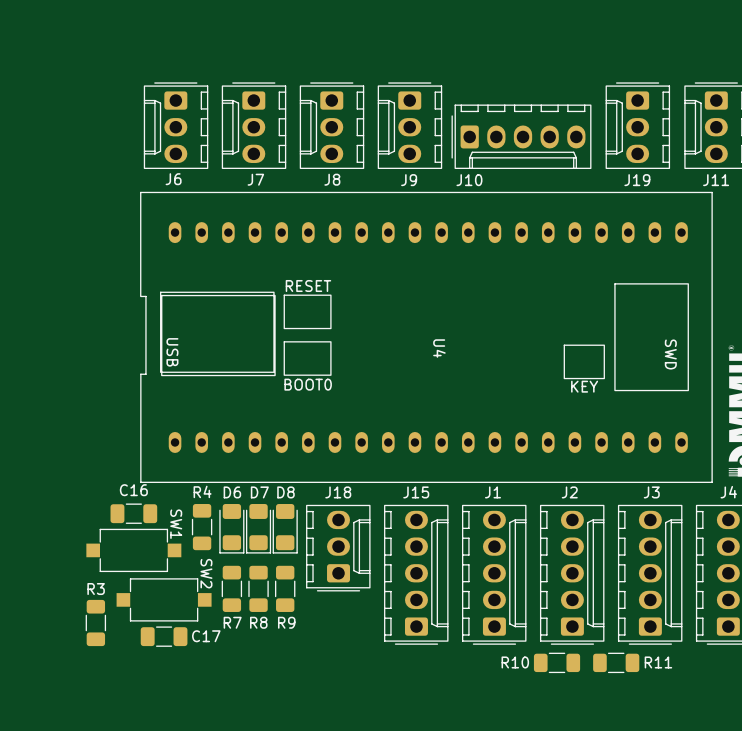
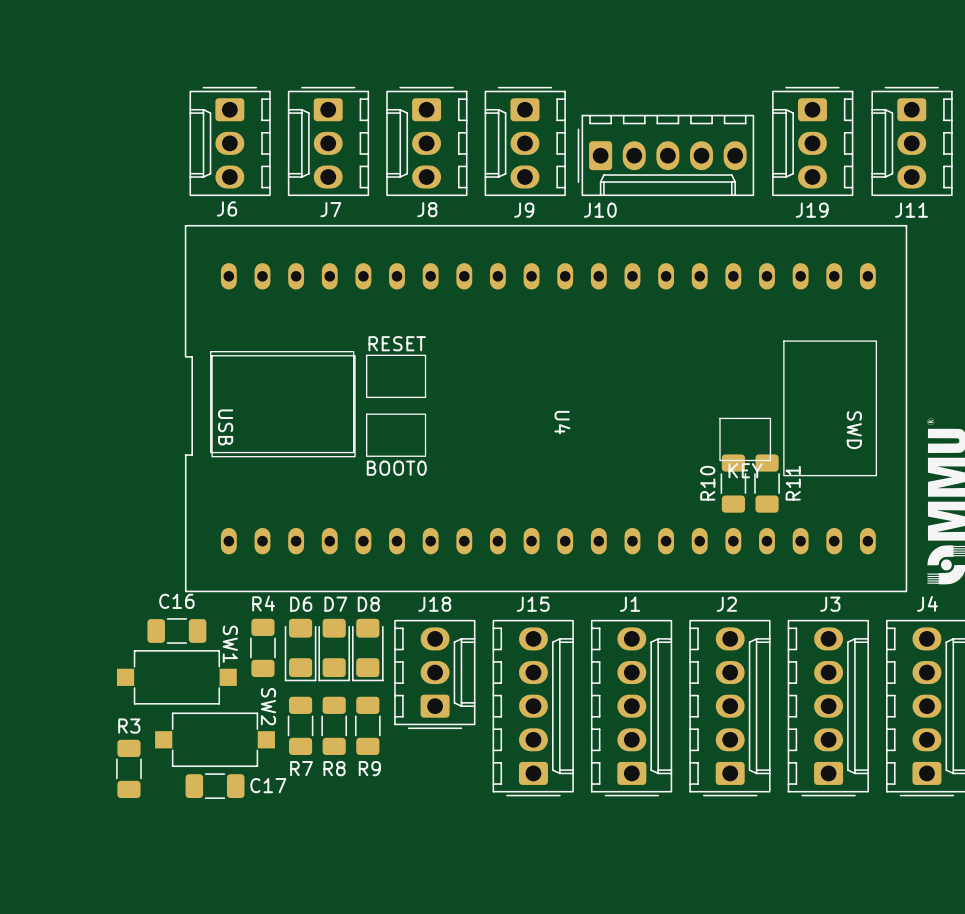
R10 name position: R10 (515, 662) -> R10 (707, 483)
R10 rotation: 0° (557, 662) -> 90° clockwise (733, 483)
R10 position: (557, 662) -> (733, 483)
R11 rotation: 0° (616, 662) -> 90° clockwise (767, 483)
R11 position: (616, 662) -> (767, 483)

